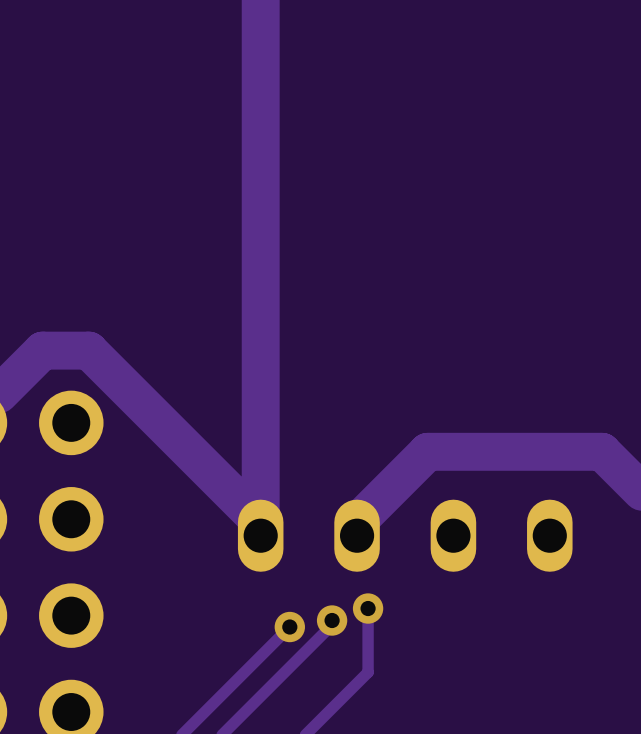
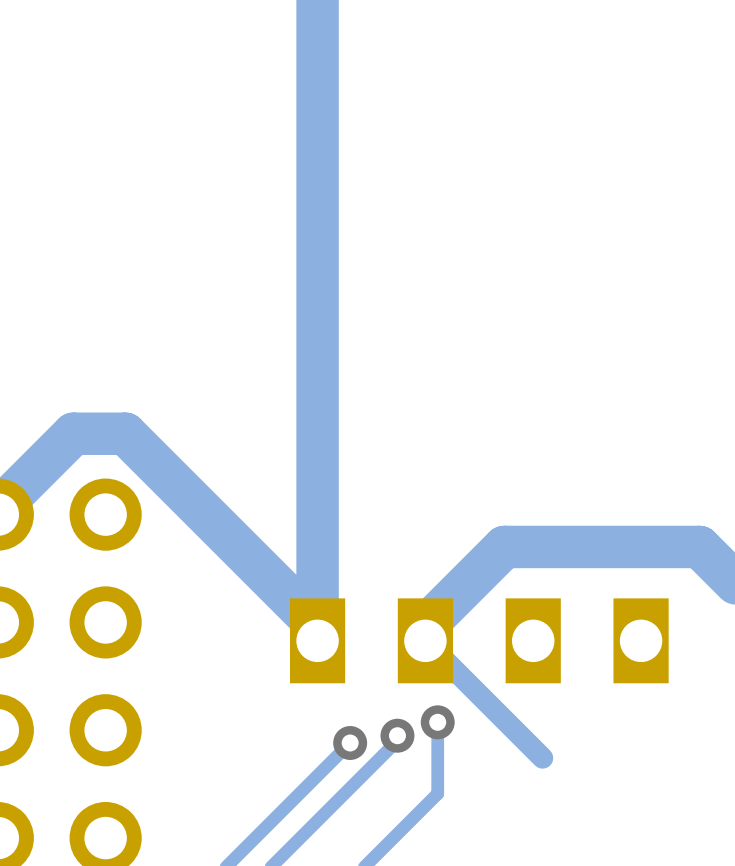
part footprint: [237, 499, 573, 572] -> [289, 598, 669, 684]
track: none -> (425, 625) (425, 640) (542, 758)

